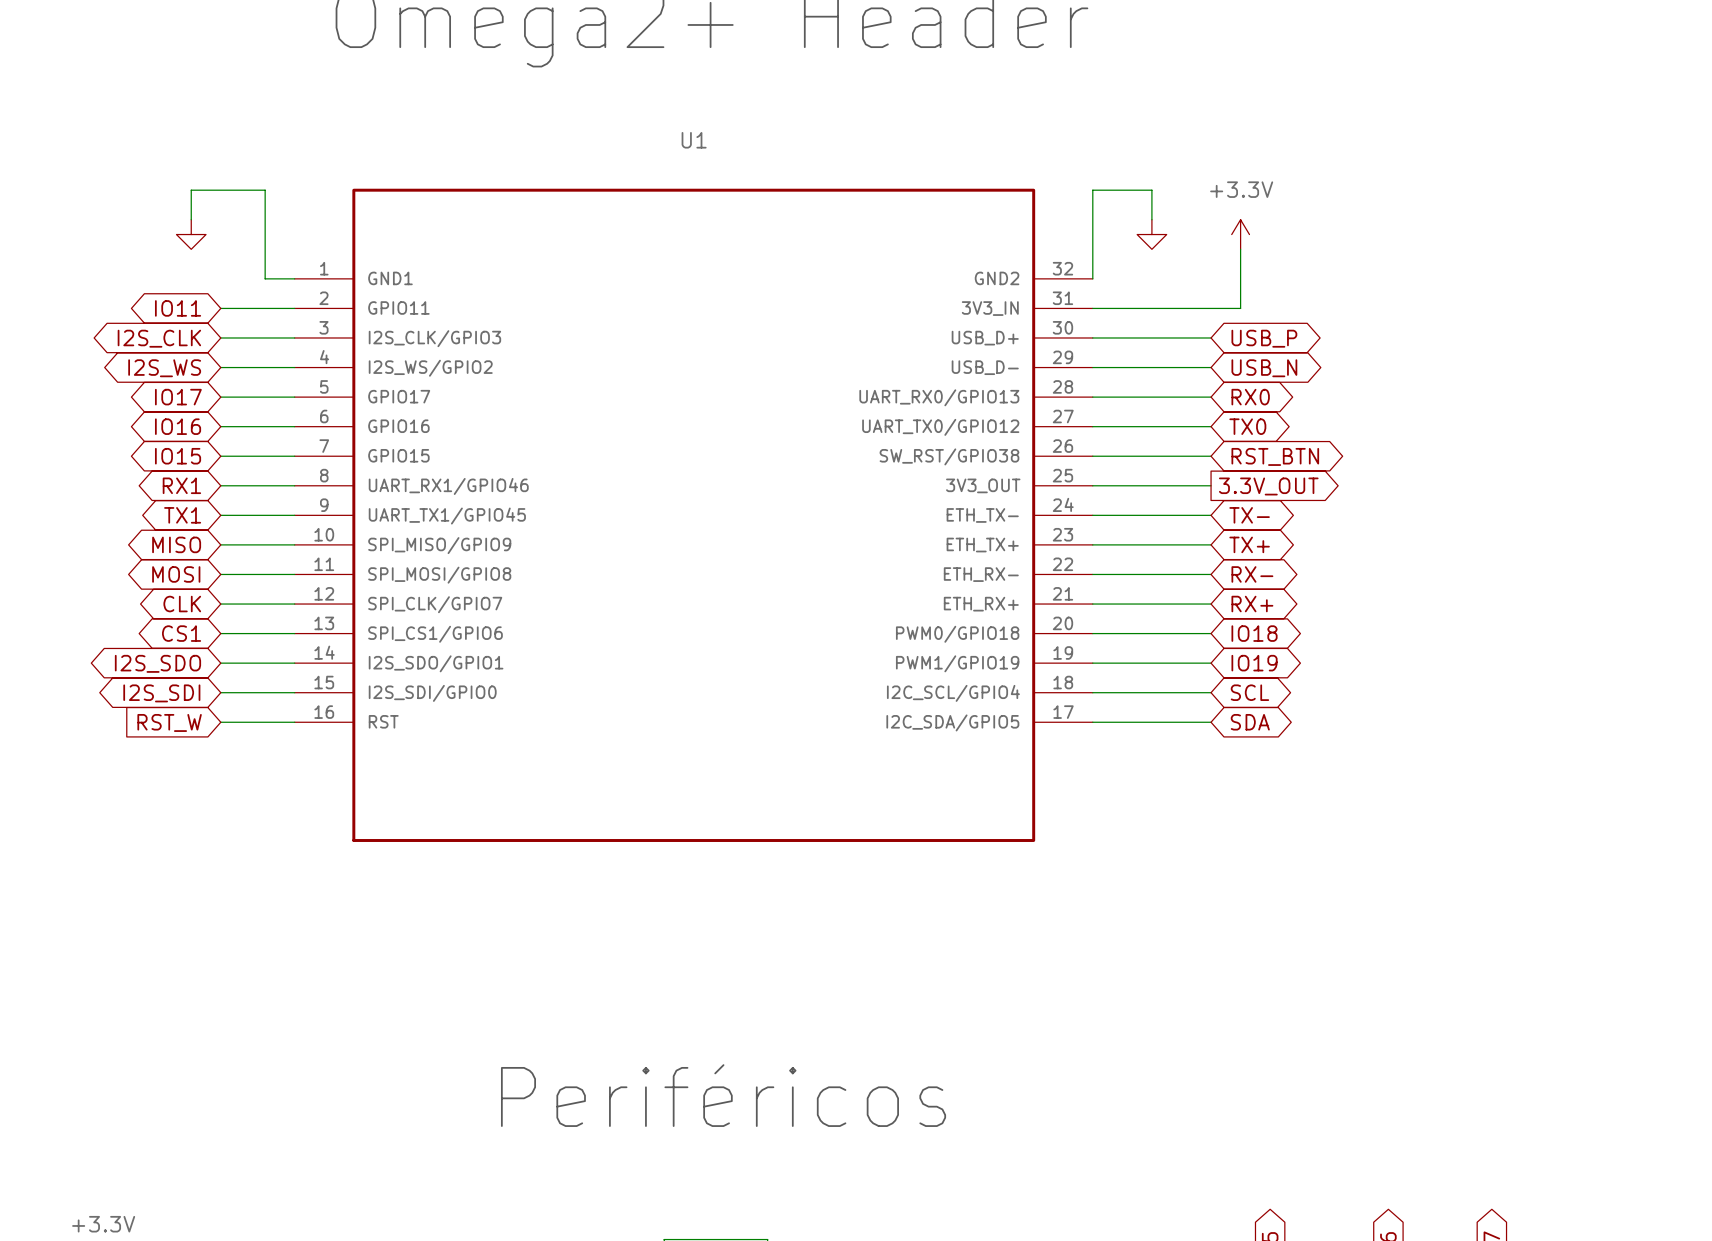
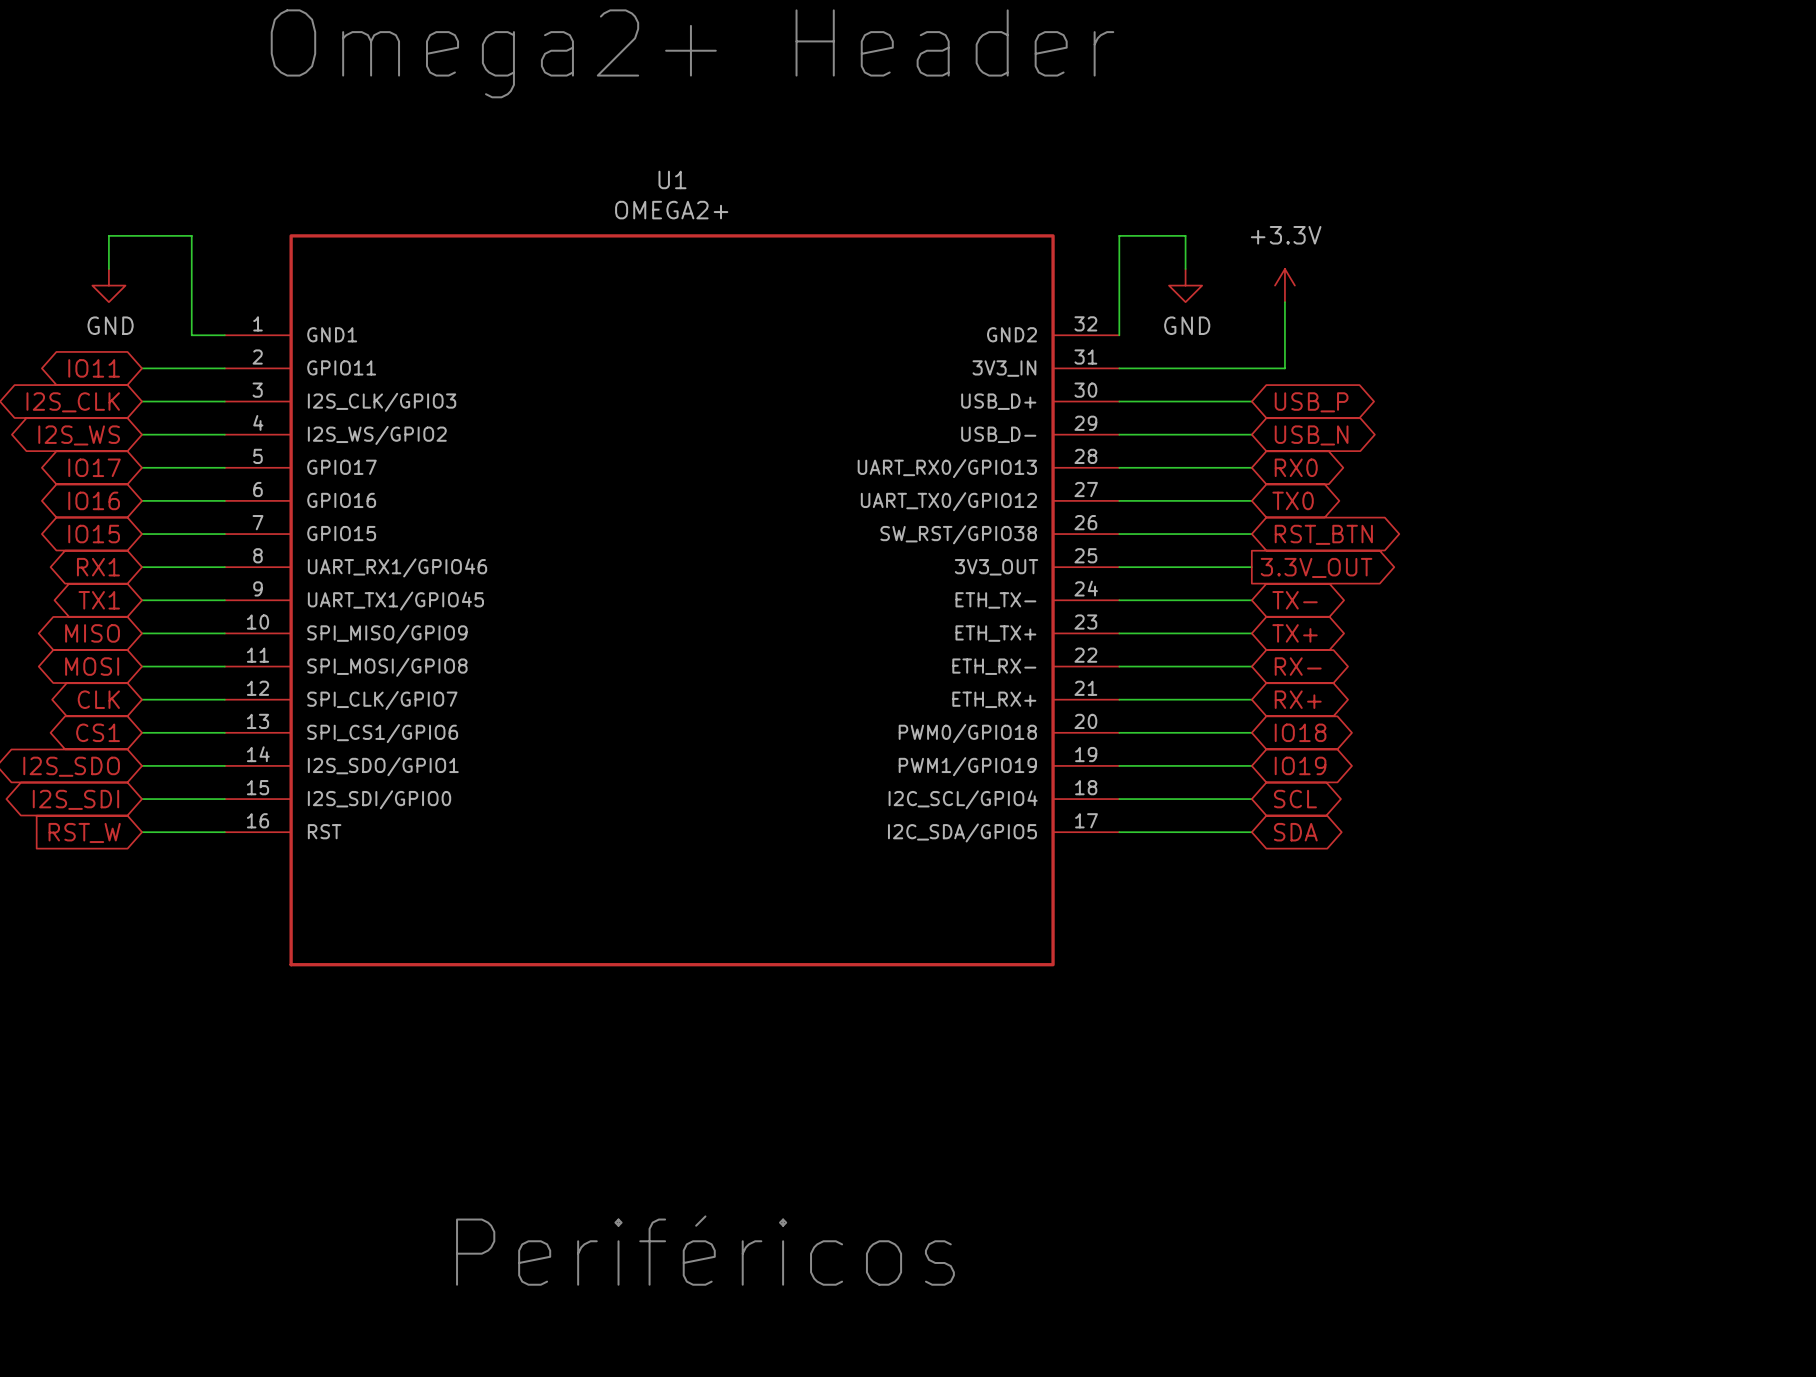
U1 value: none -> OMEGA2+ (671, 210)
power symbol text: none -> GND (110, 325)
power symbol text: none -> GND (1187, 325)

